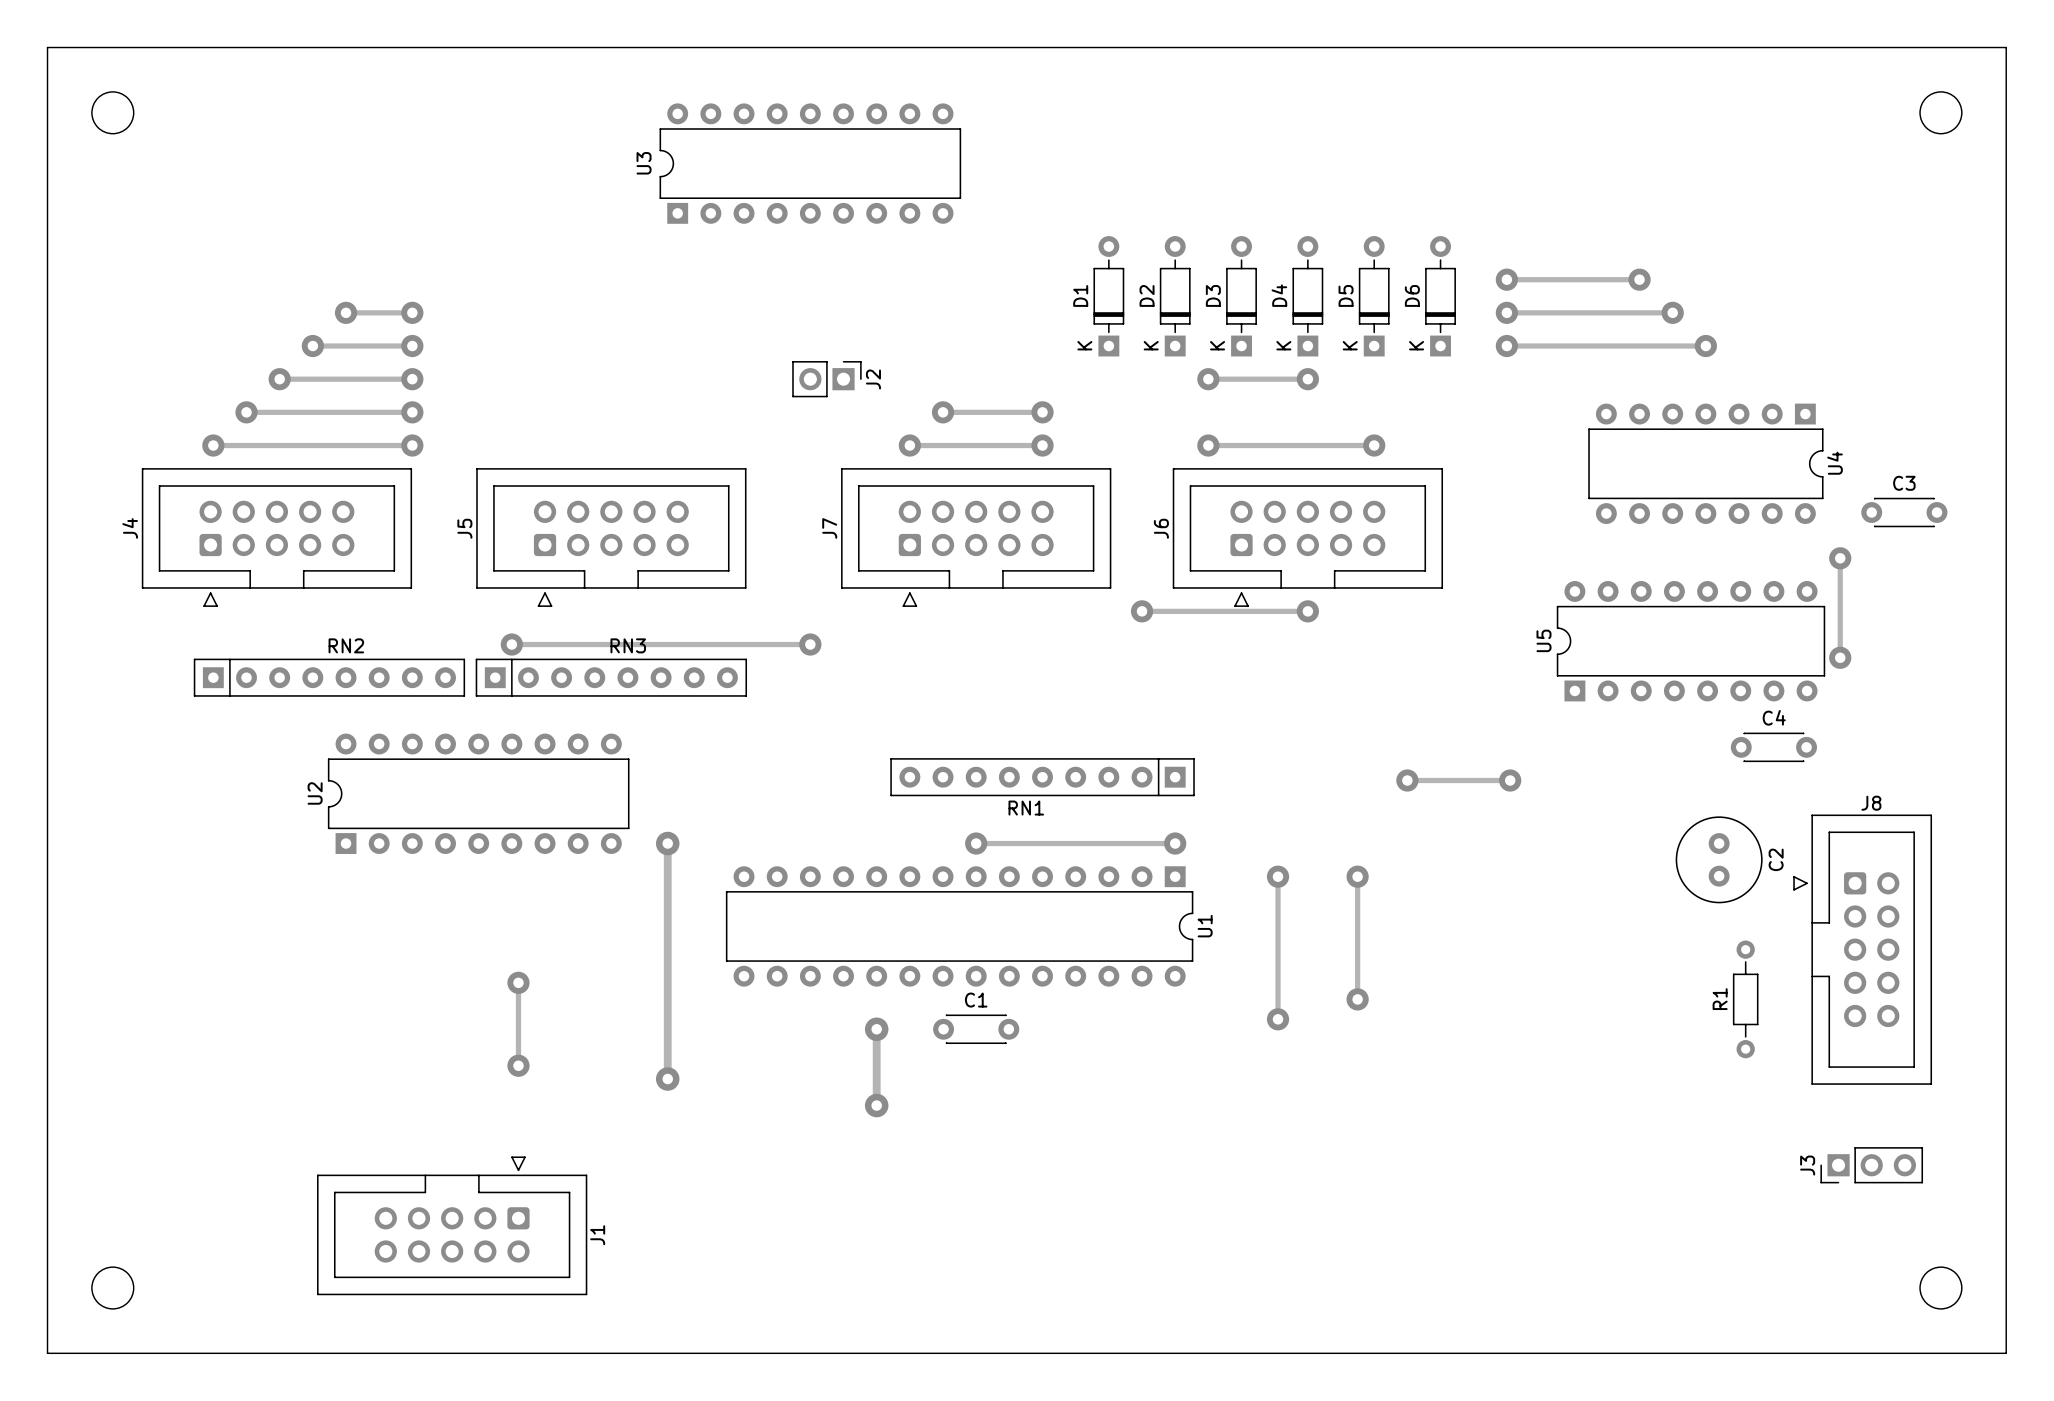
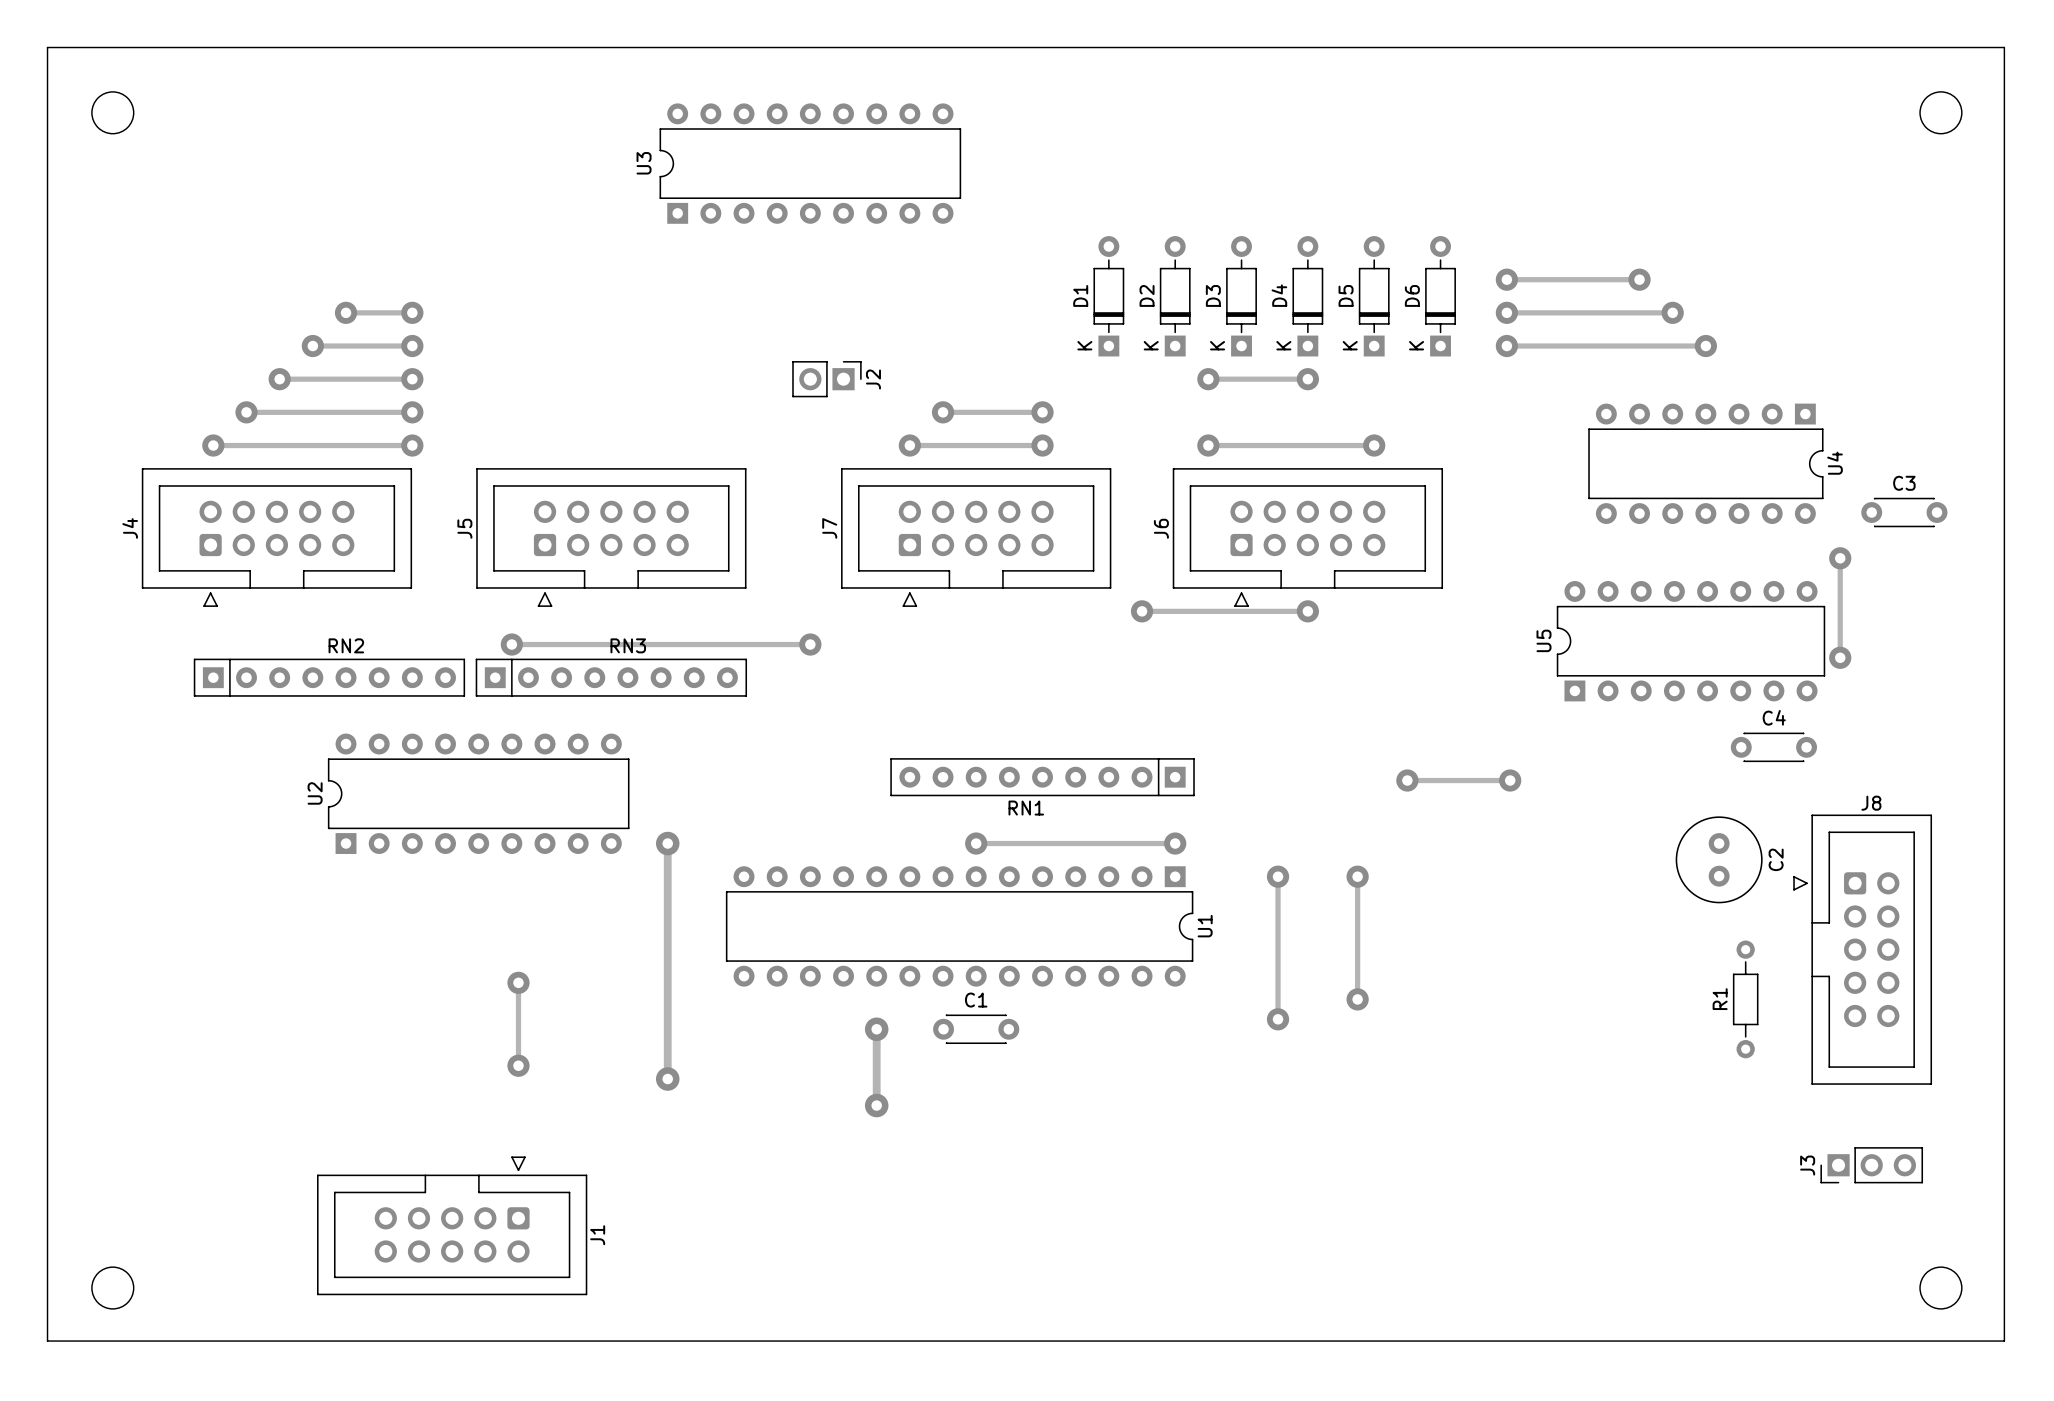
board edge: (2004, 47) (2006, 47) (2006, 1353) (47, 1353) (47, 1341) -> (2004, 47) (2004, 1341) (47, 1341)

